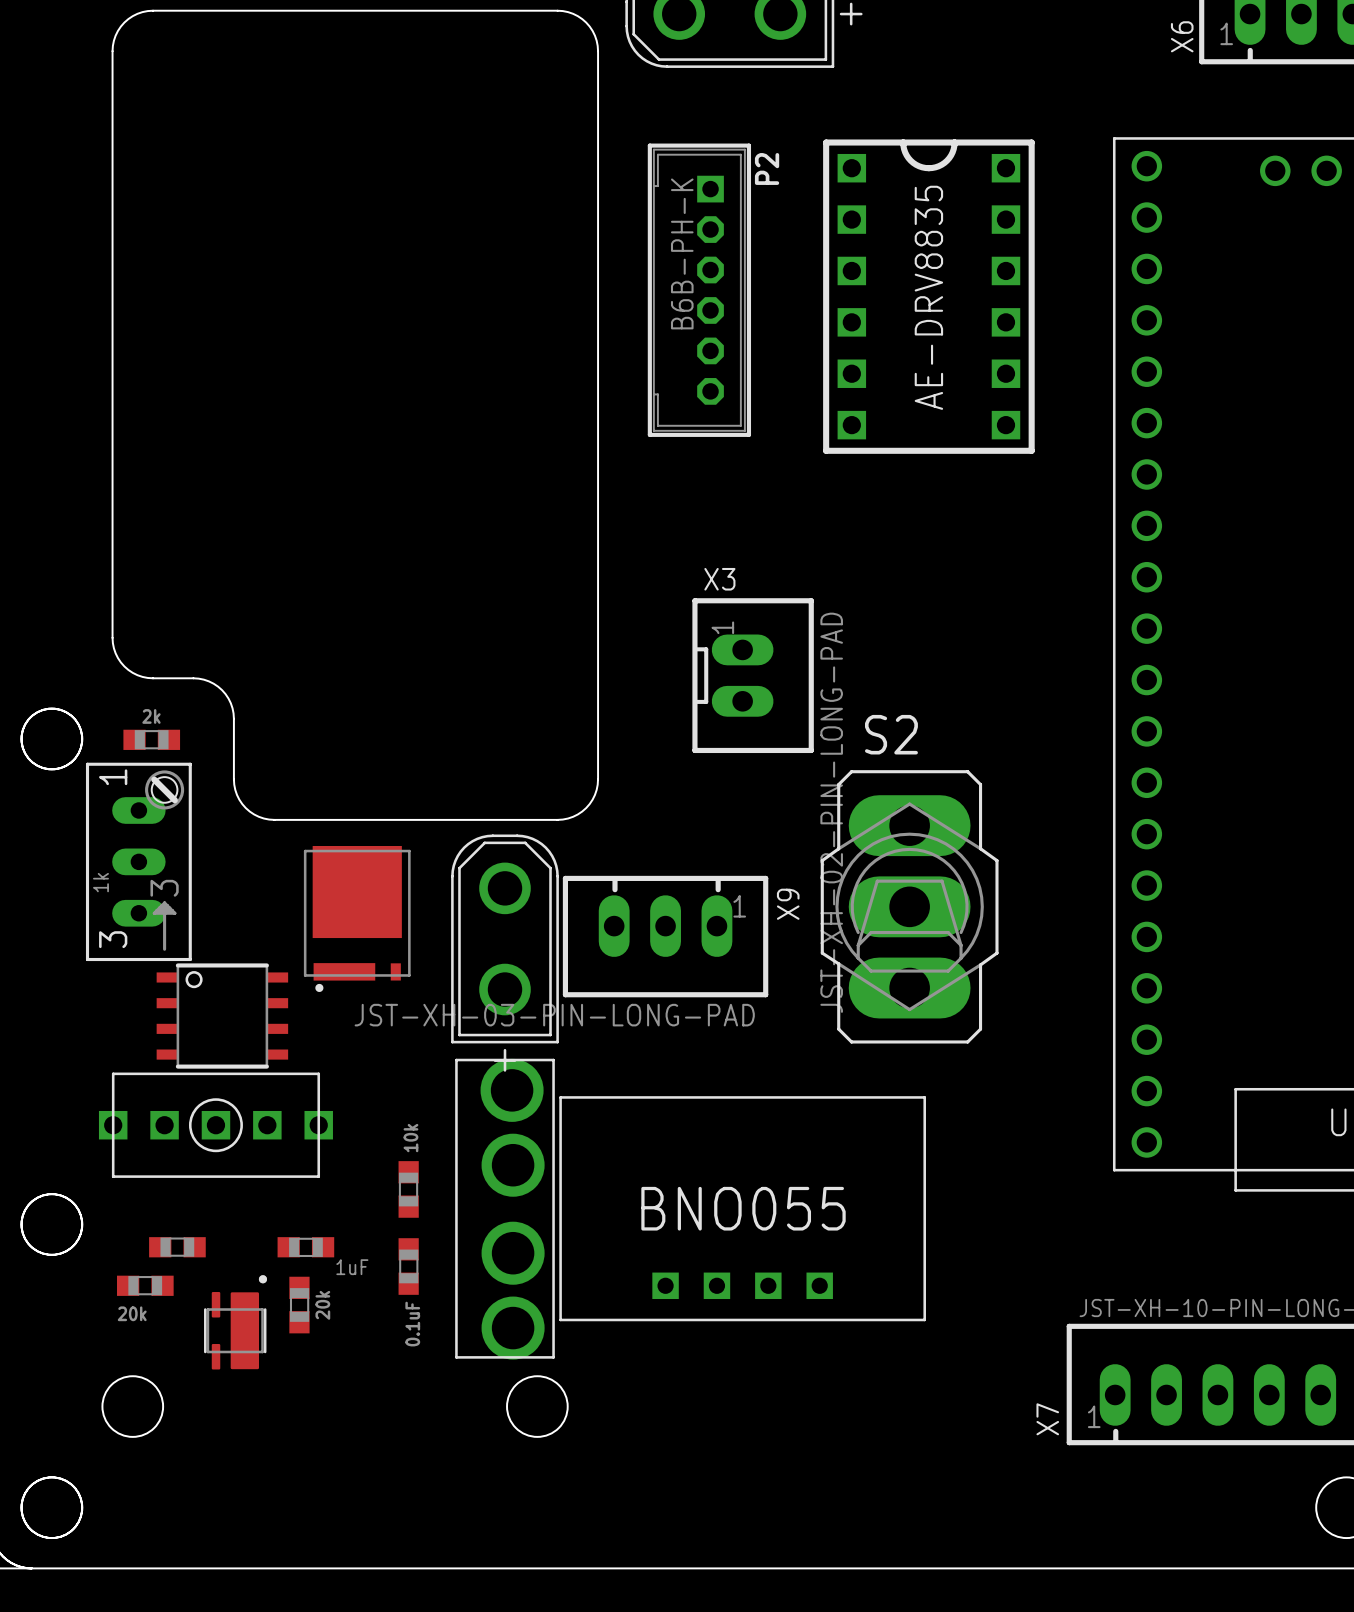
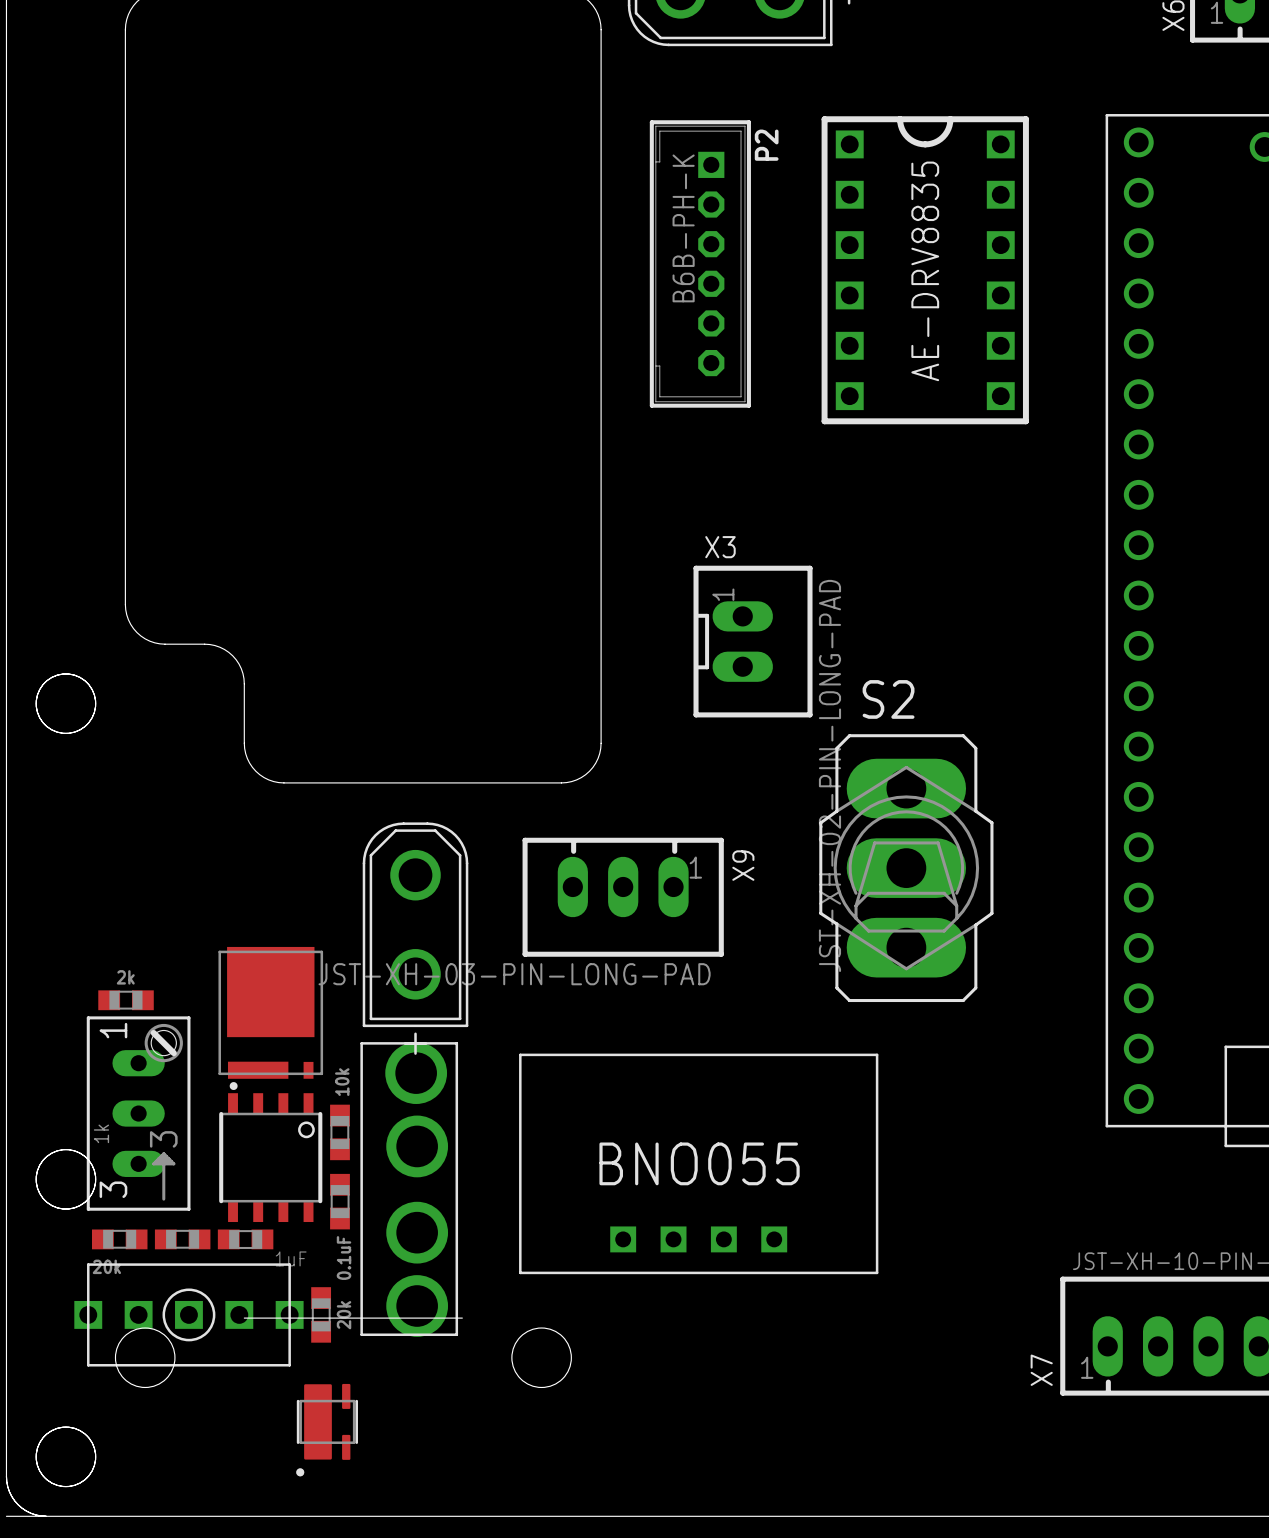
part position: (151, 739) -> (126, 1000)
part: 1k (138, 861) -> none
part position: (357, 918) -> (270, 1018)
X9 position: (665, 936) -> (623, 897)
part position: (504, 953) -> (415, 938)
part rotation: 0° (222, 1016) -> 90° clockwise (270, 1157)
part position: (222, 1016) -> (270, 1157)
part position: (215, 1125) -> (188, 1314)
part: none -> 1k (138, 1113)
part position: (408, 1189) -> (339, 1132)
part position: (742, 1208) -> (698, 1163)
part position: (504, 1209) -> (409, 1189)
part position: (177, 1247) -> (182, 1239)
part position: (305, 1247) -> (245, 1239)
part position: (408, 1266) -> (339, 1201)
part position: (145, 1285) -> (119, 1239)
part position: (299, 1305) -> (321, 1314)
part rotation: 0° (235, 1322) -> 180° (327, 1430)
part position: (235, 1322) -> (327, 1430)
board edge: none -> (244, 1318) (462, 1318)

